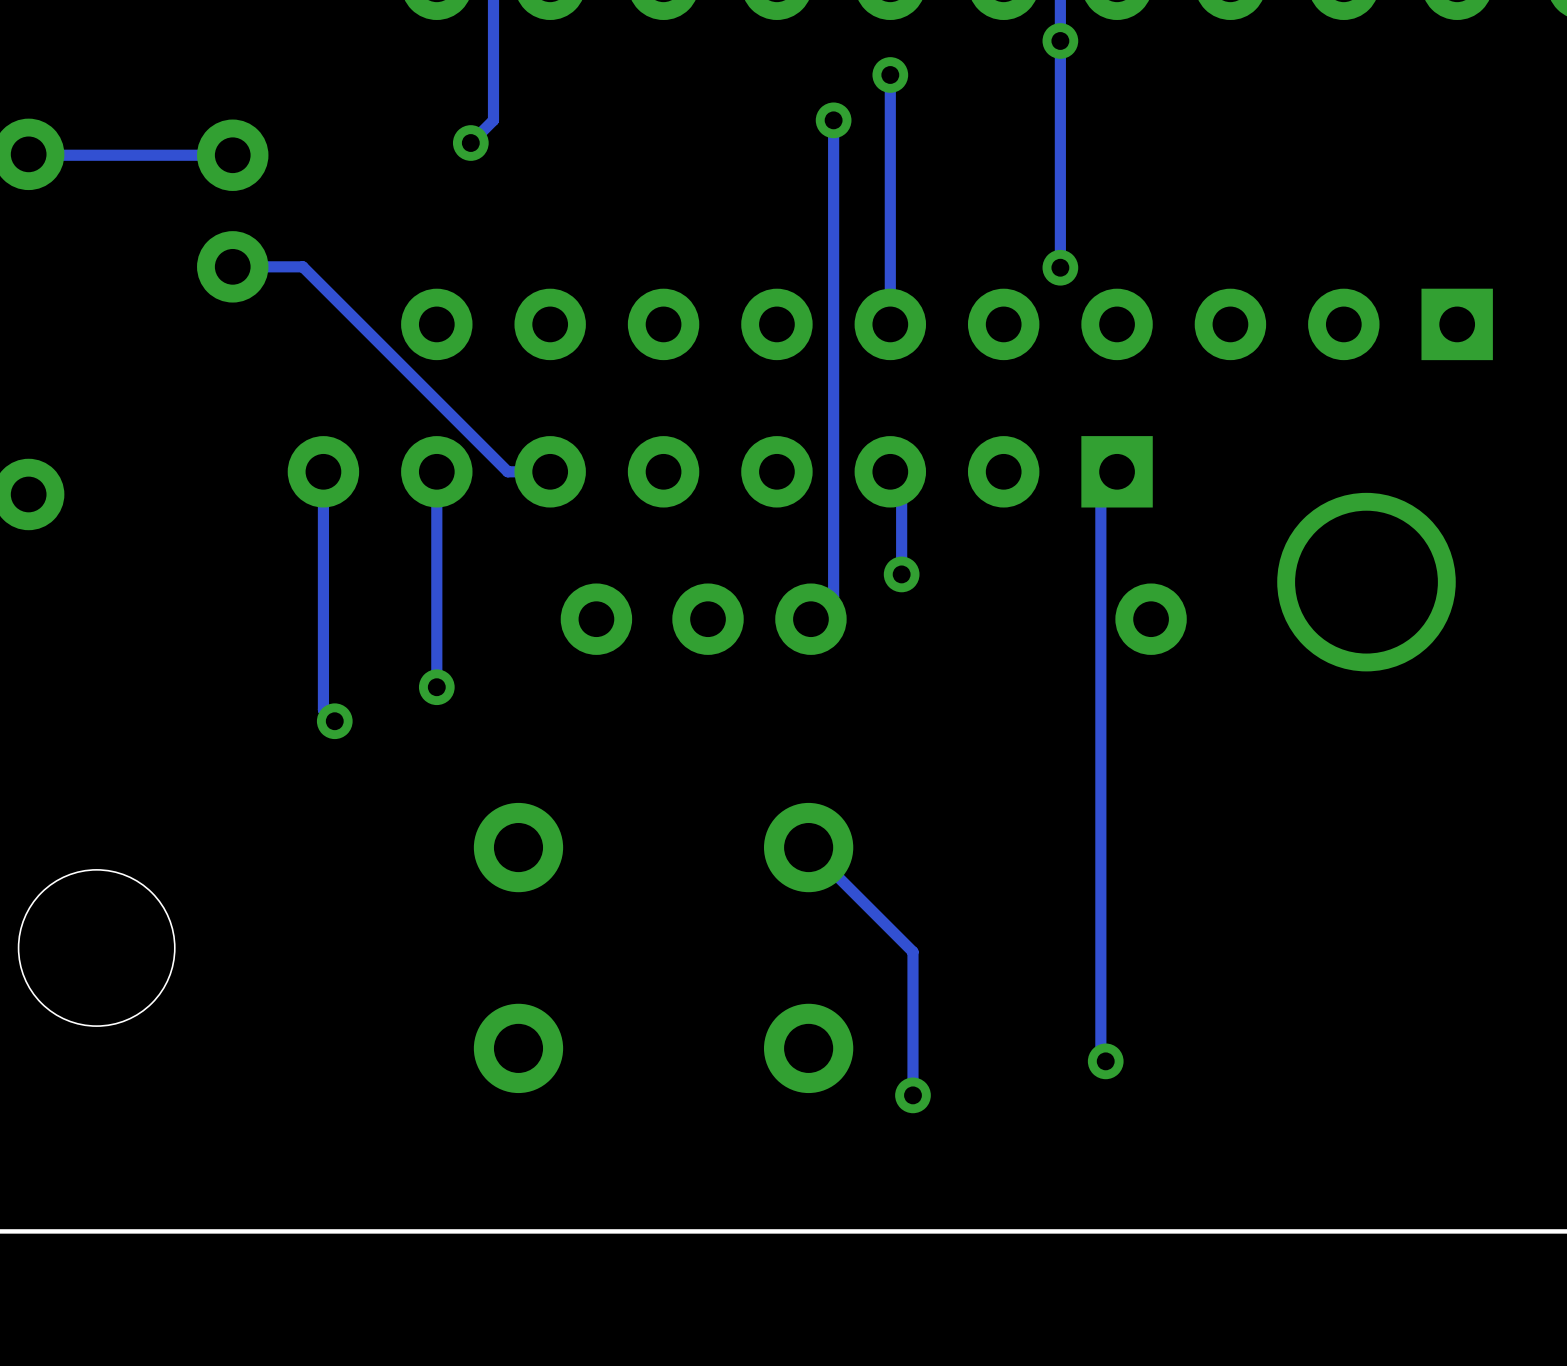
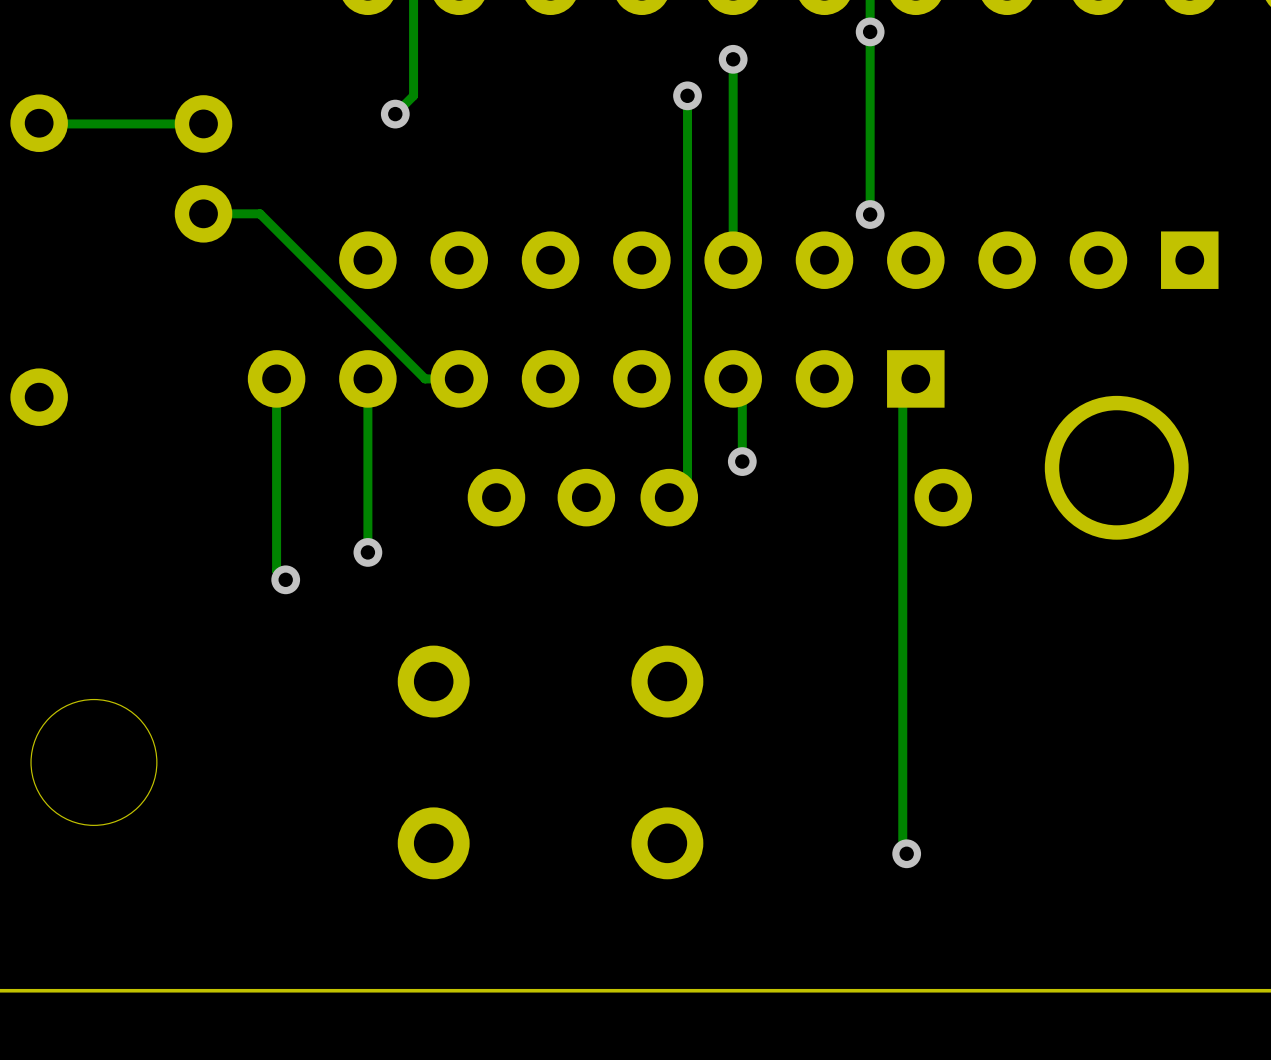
track: (808, 847) (912, 951) (912, 1095) -> none
via: (912, 1095) -> none

